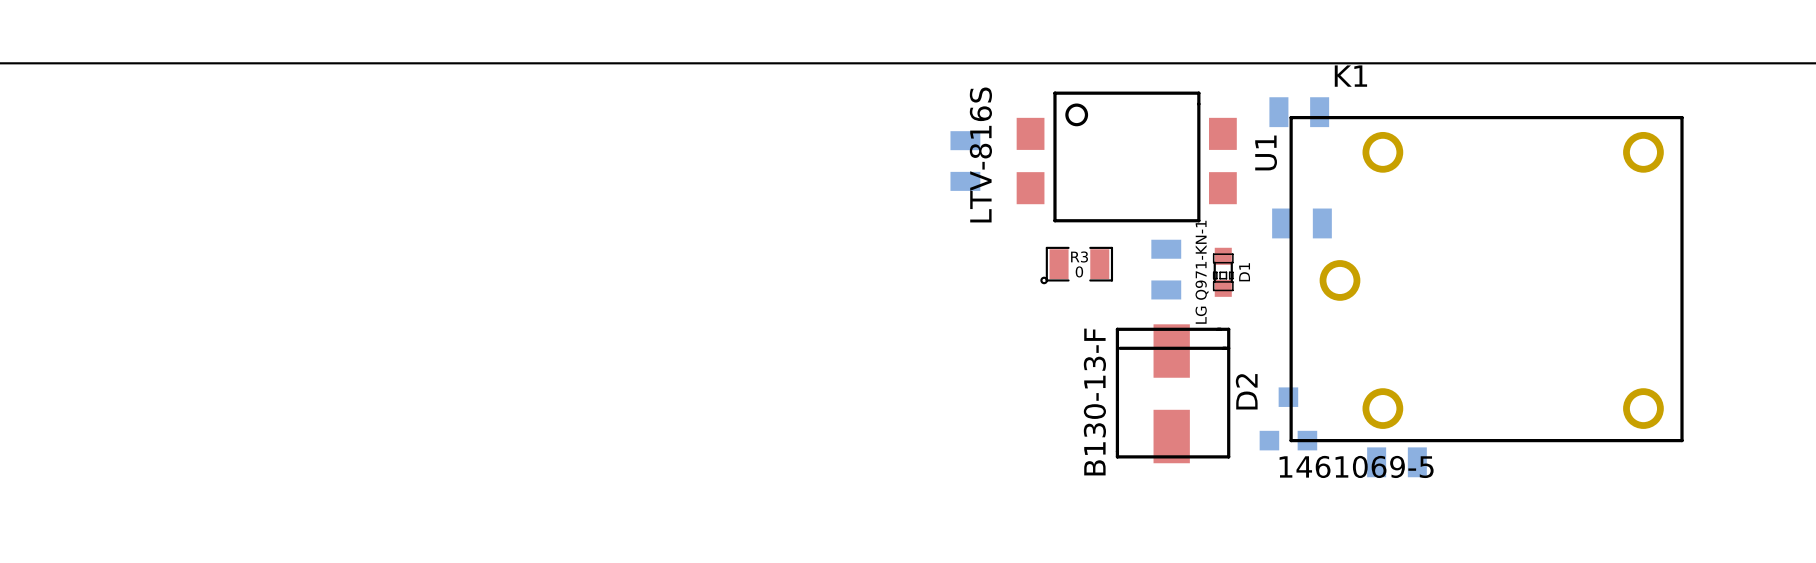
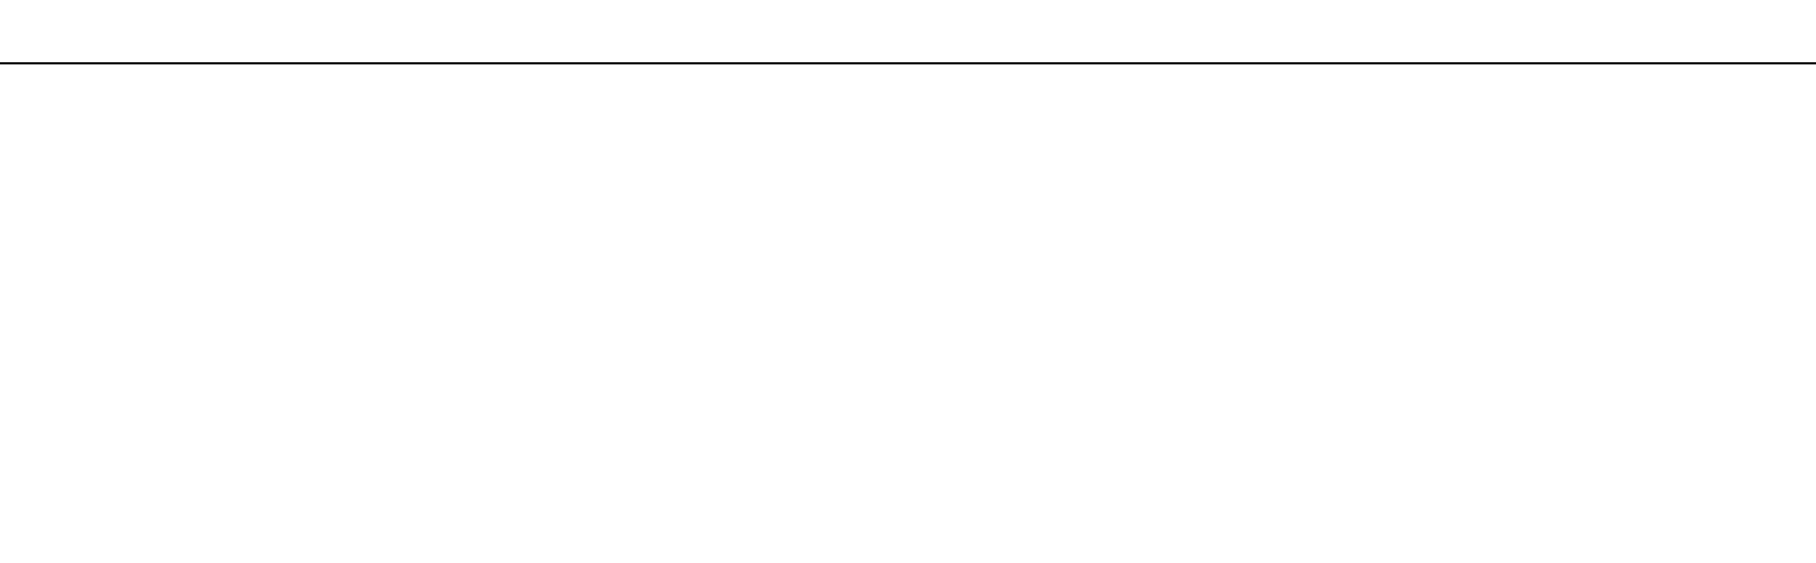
part: (1299, 112) -> none
U1: LTV-816S (1126, 156) -> none
part: (965, 161) -> none
part: (1301, 223) -> none
R3: 0 (1076, 265) -> none
part: (1166, 269) -> none
D1: LG Q971-KN-1 (1223, 272) -> none
K1: 1461069-5 (1486, 279) -> none
D2: B130-13-F (1173, 393) -> none
part: (1288, 418) -> none
part: (1396, 462) -> none

